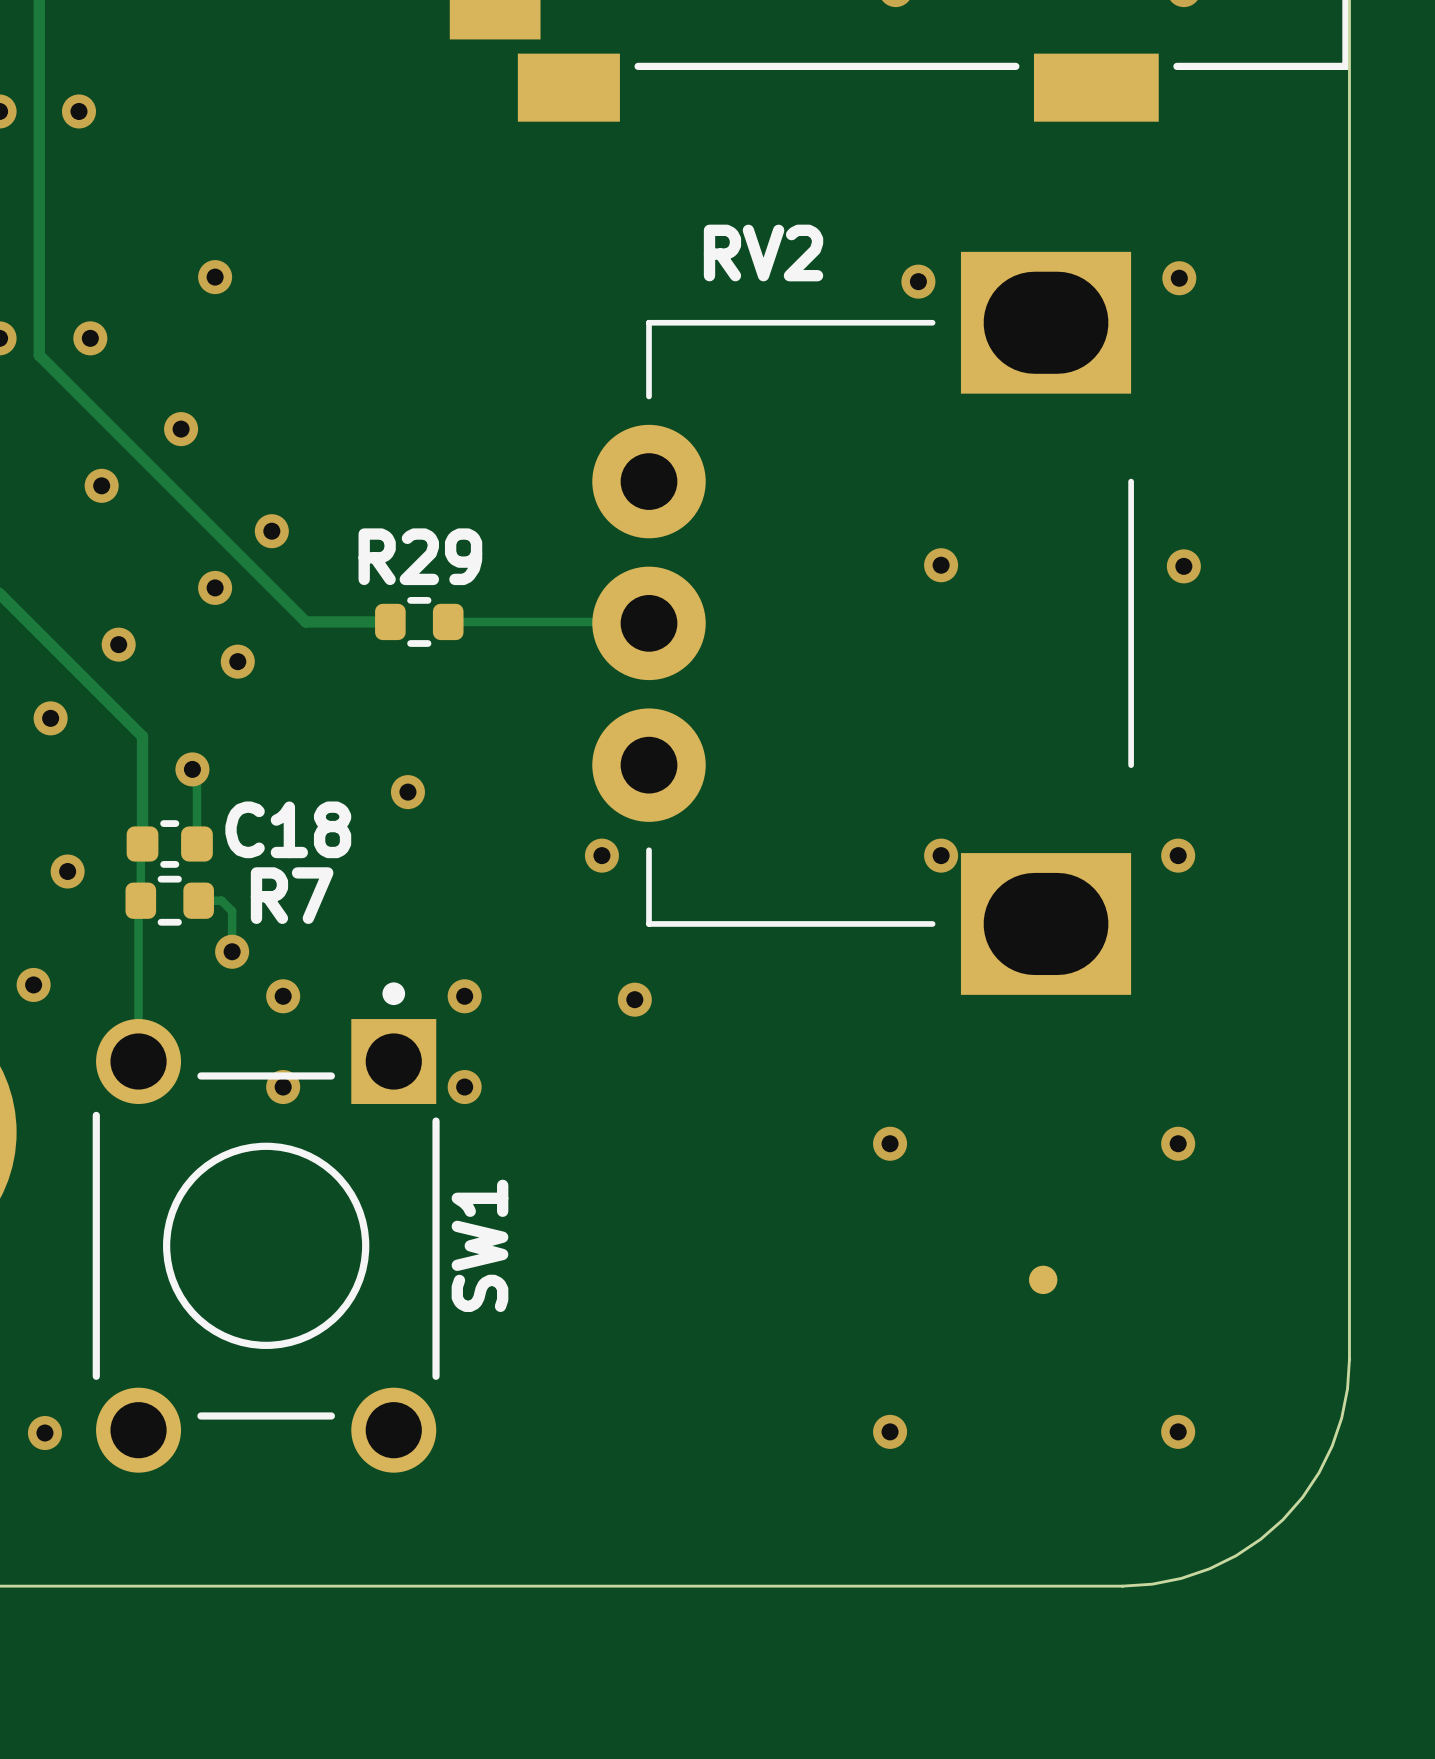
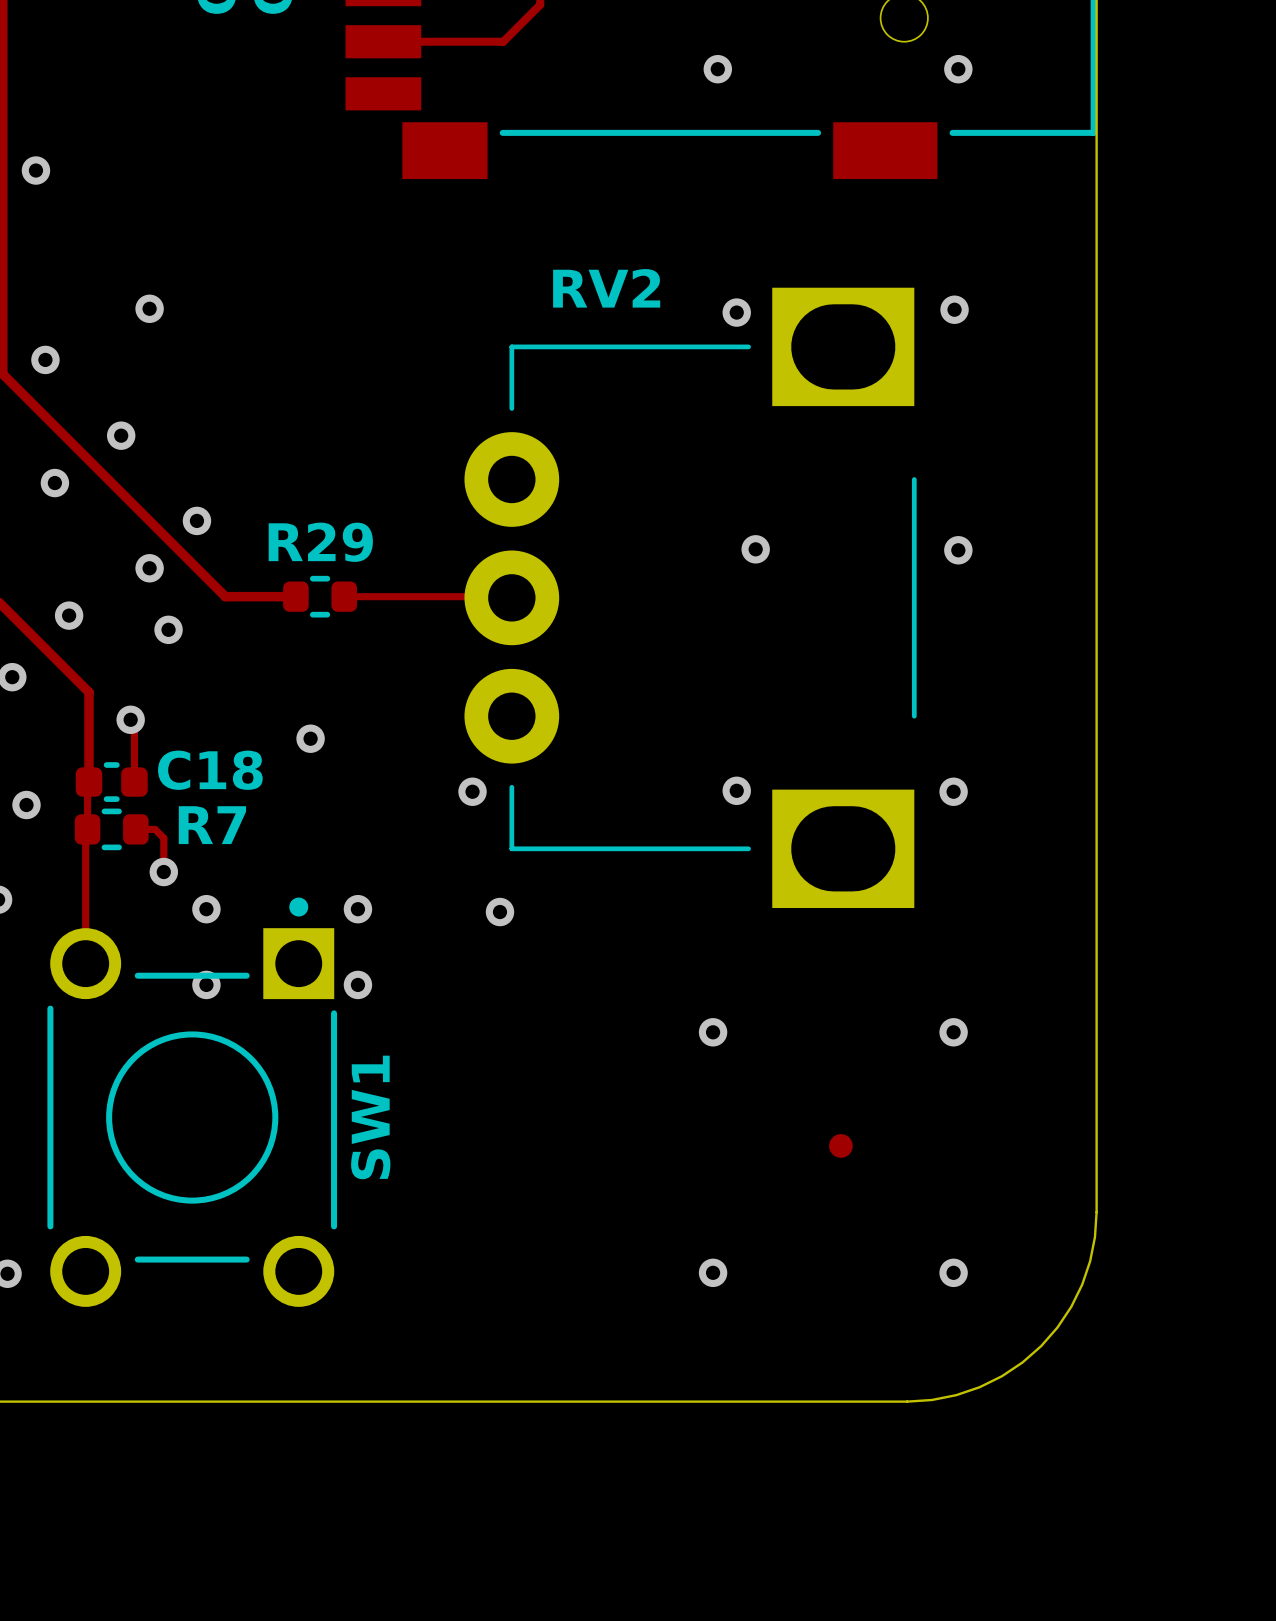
via position: (941, 855) -> (736, 790)

